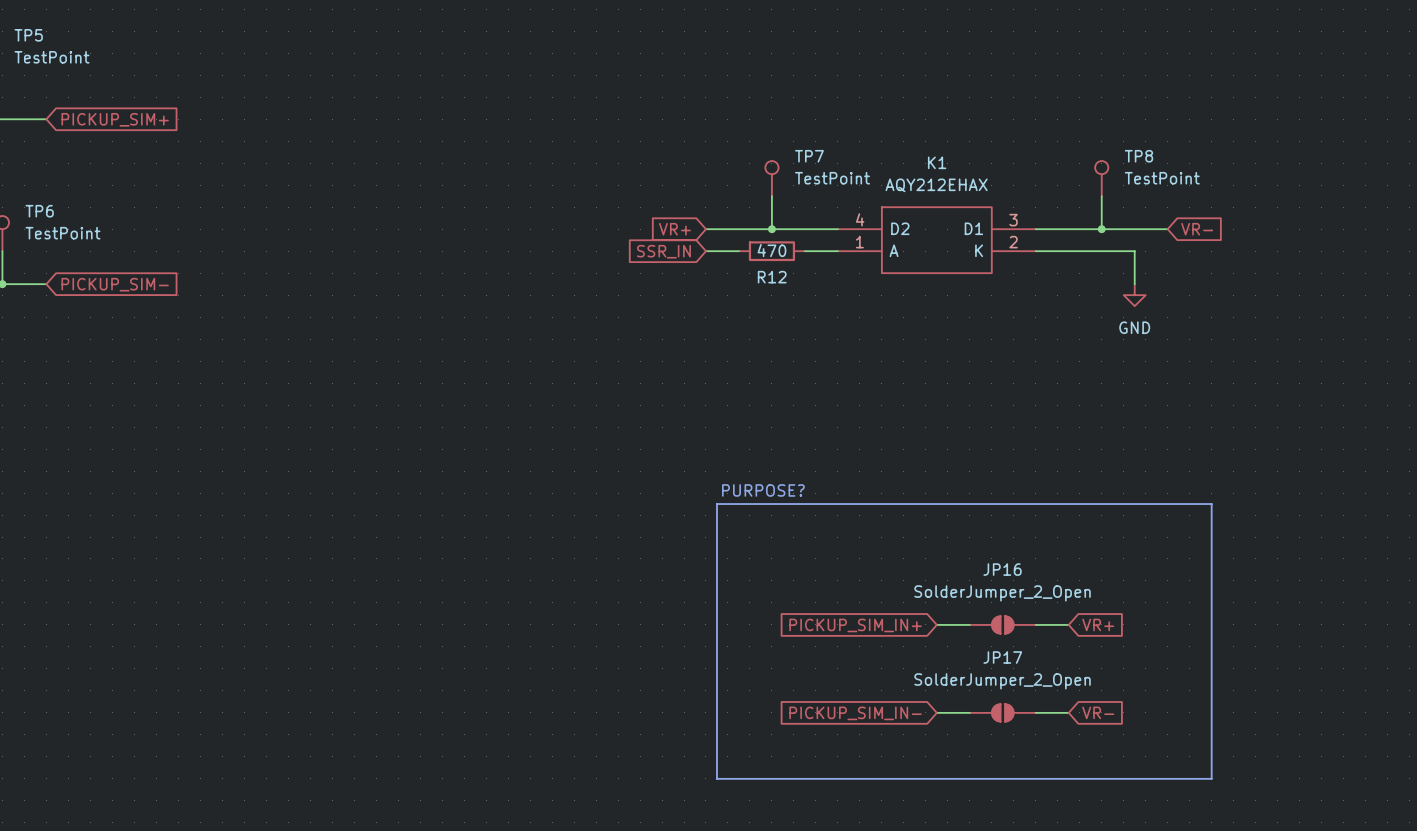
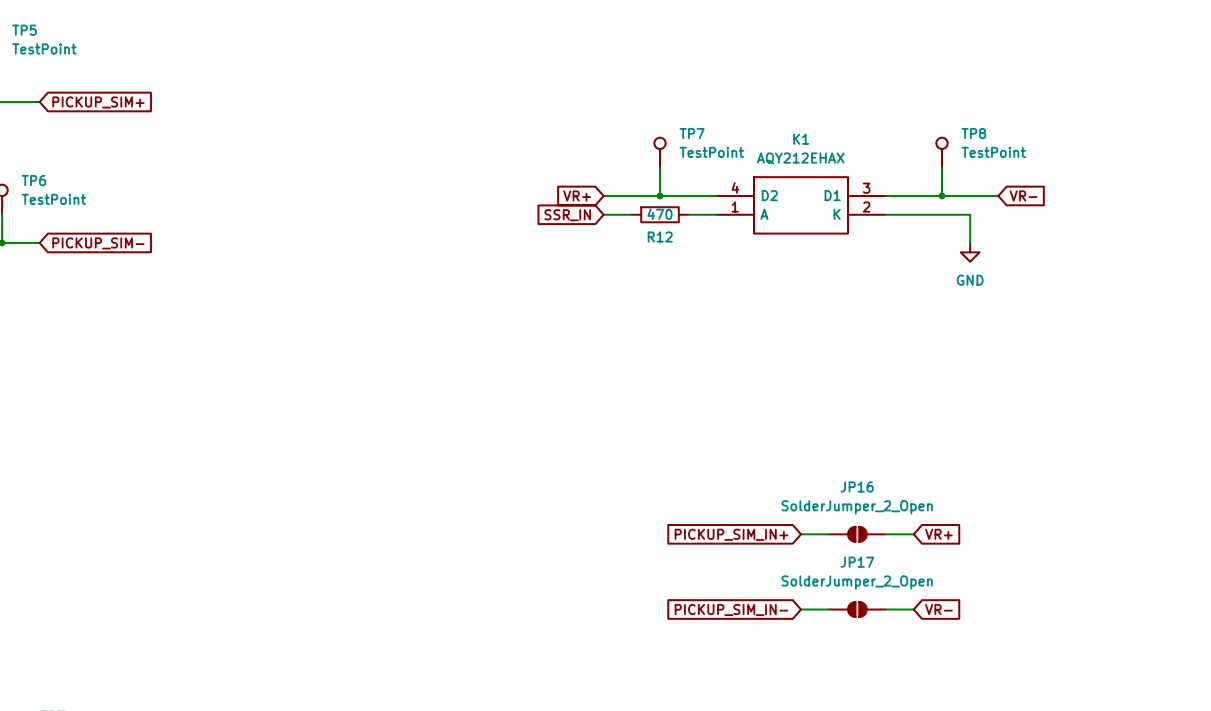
text: PURPOSE? (763, 490) -> none
line: (716, 504) (1211, 504) (1211, 778) (716, 778) (716, 504) -> none

